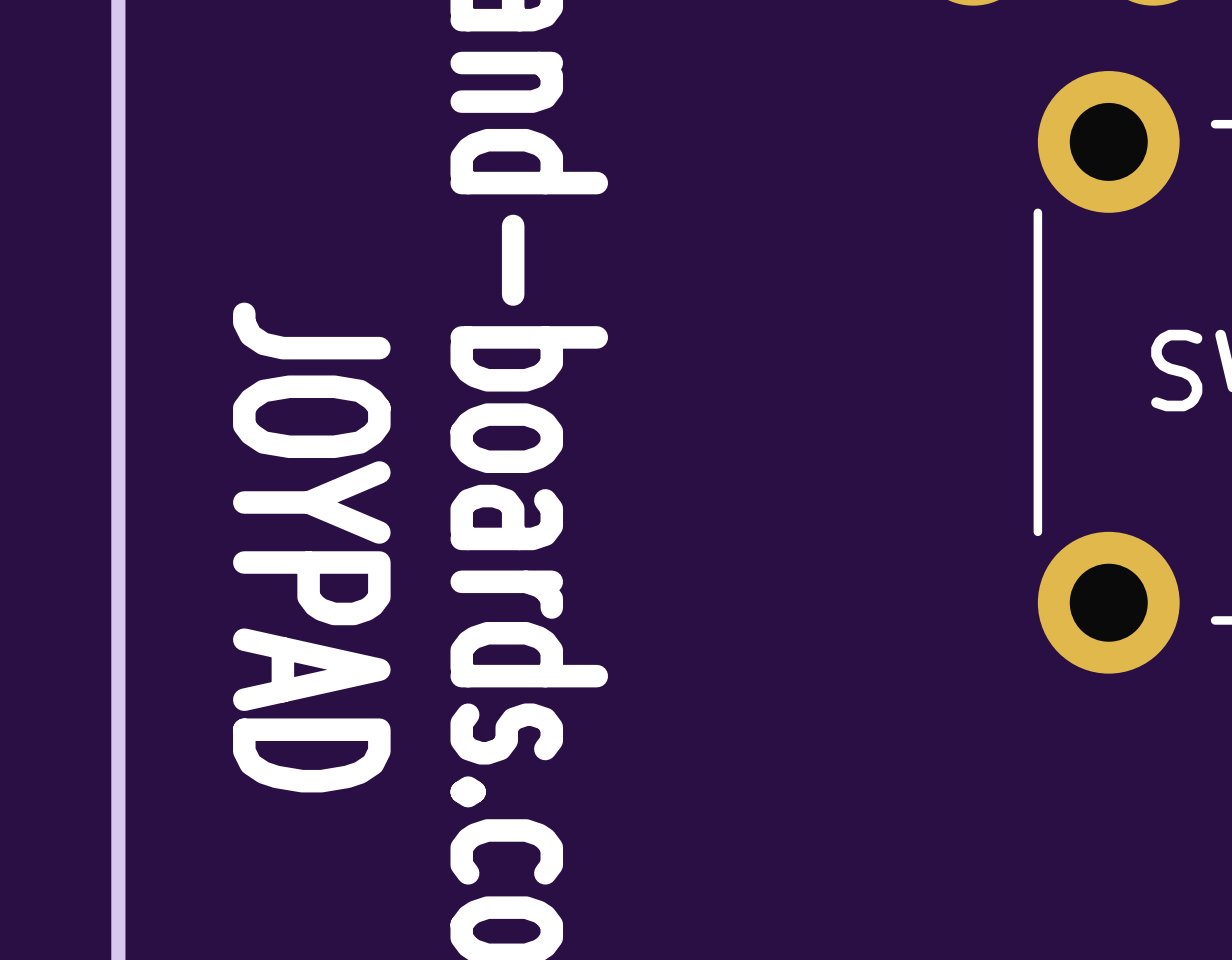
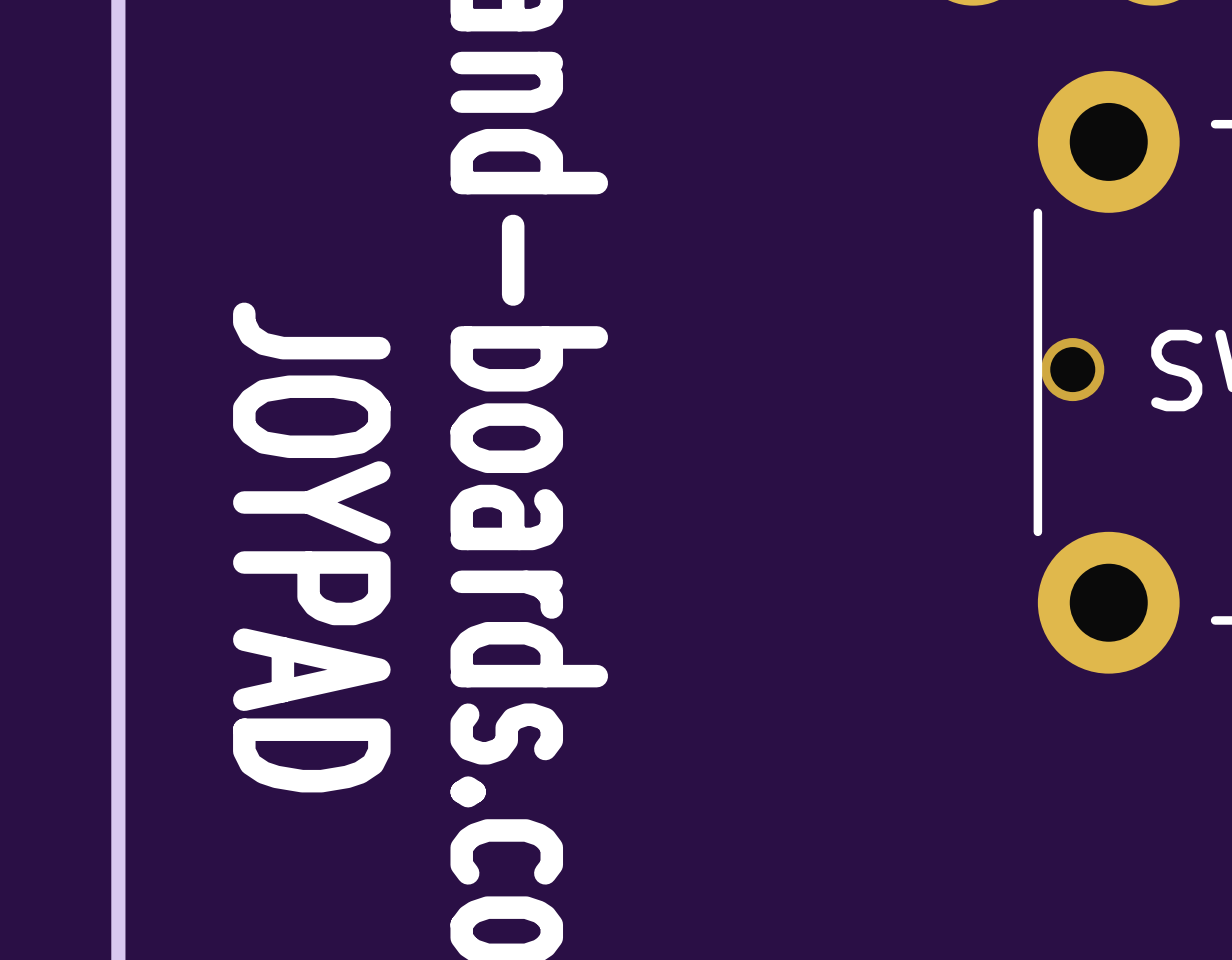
via: none -> (1072, 369)

